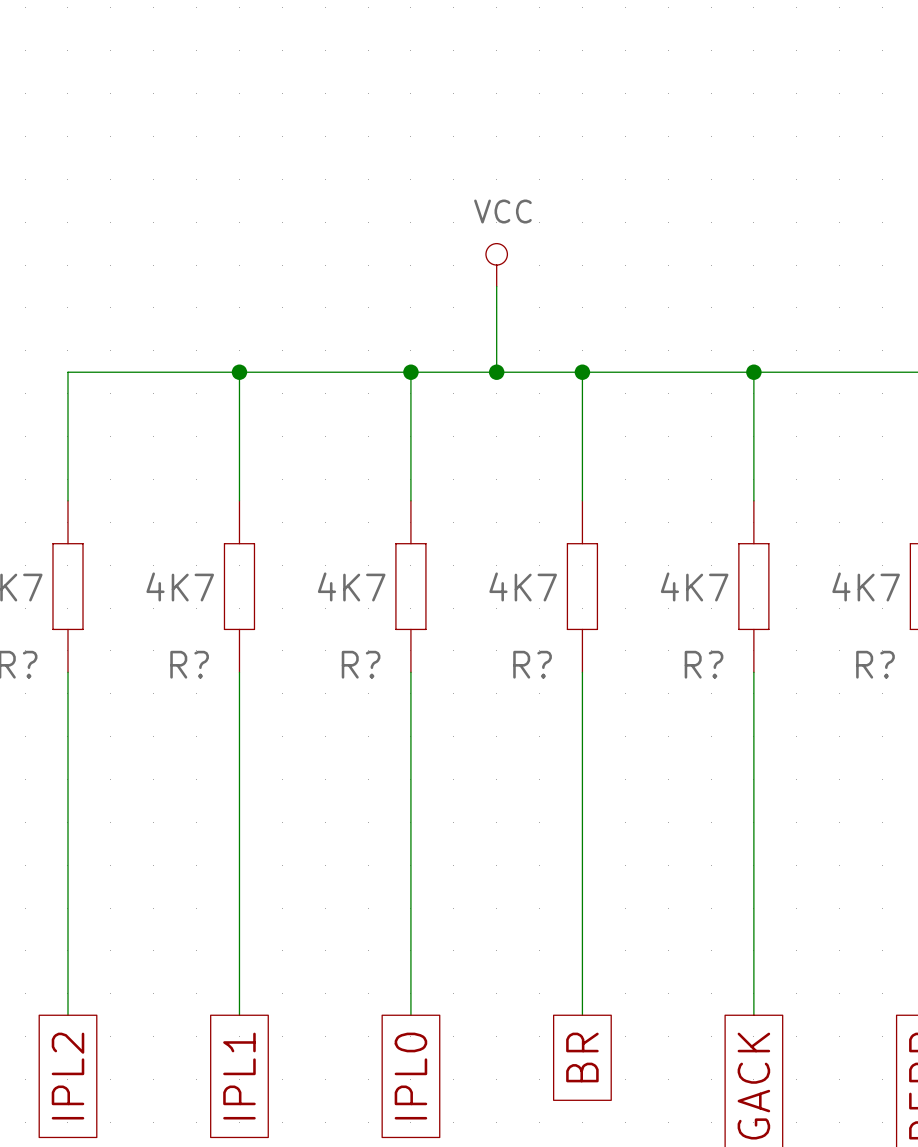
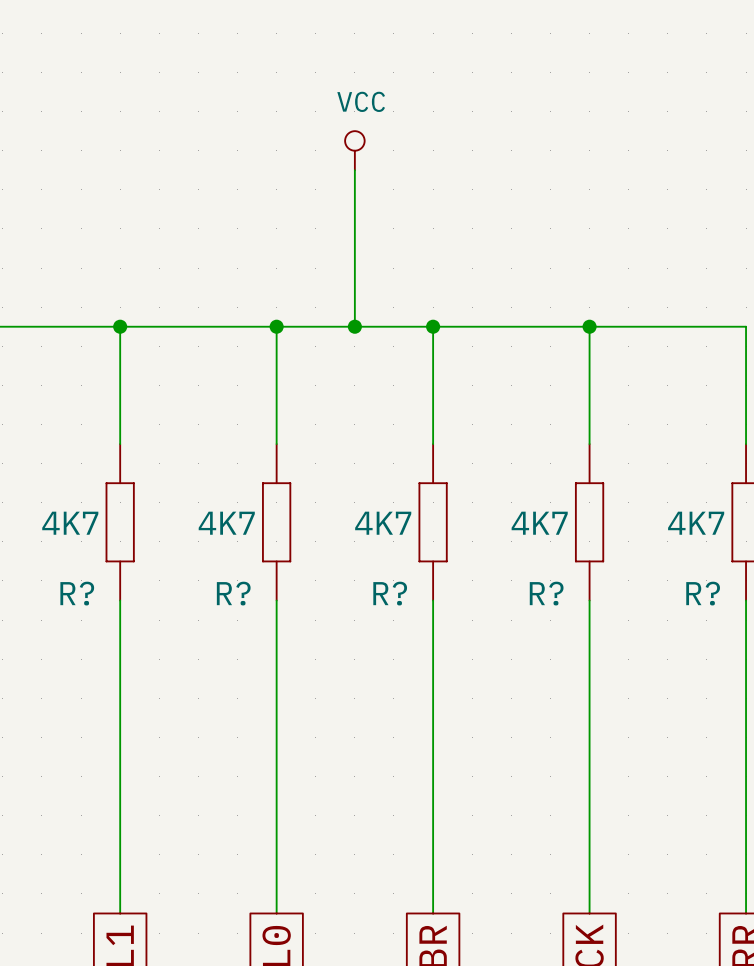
wire: none -> (354, 170) (354, 248)
power symbol position: VCC (496, 265) -> VCC (354, 150)

